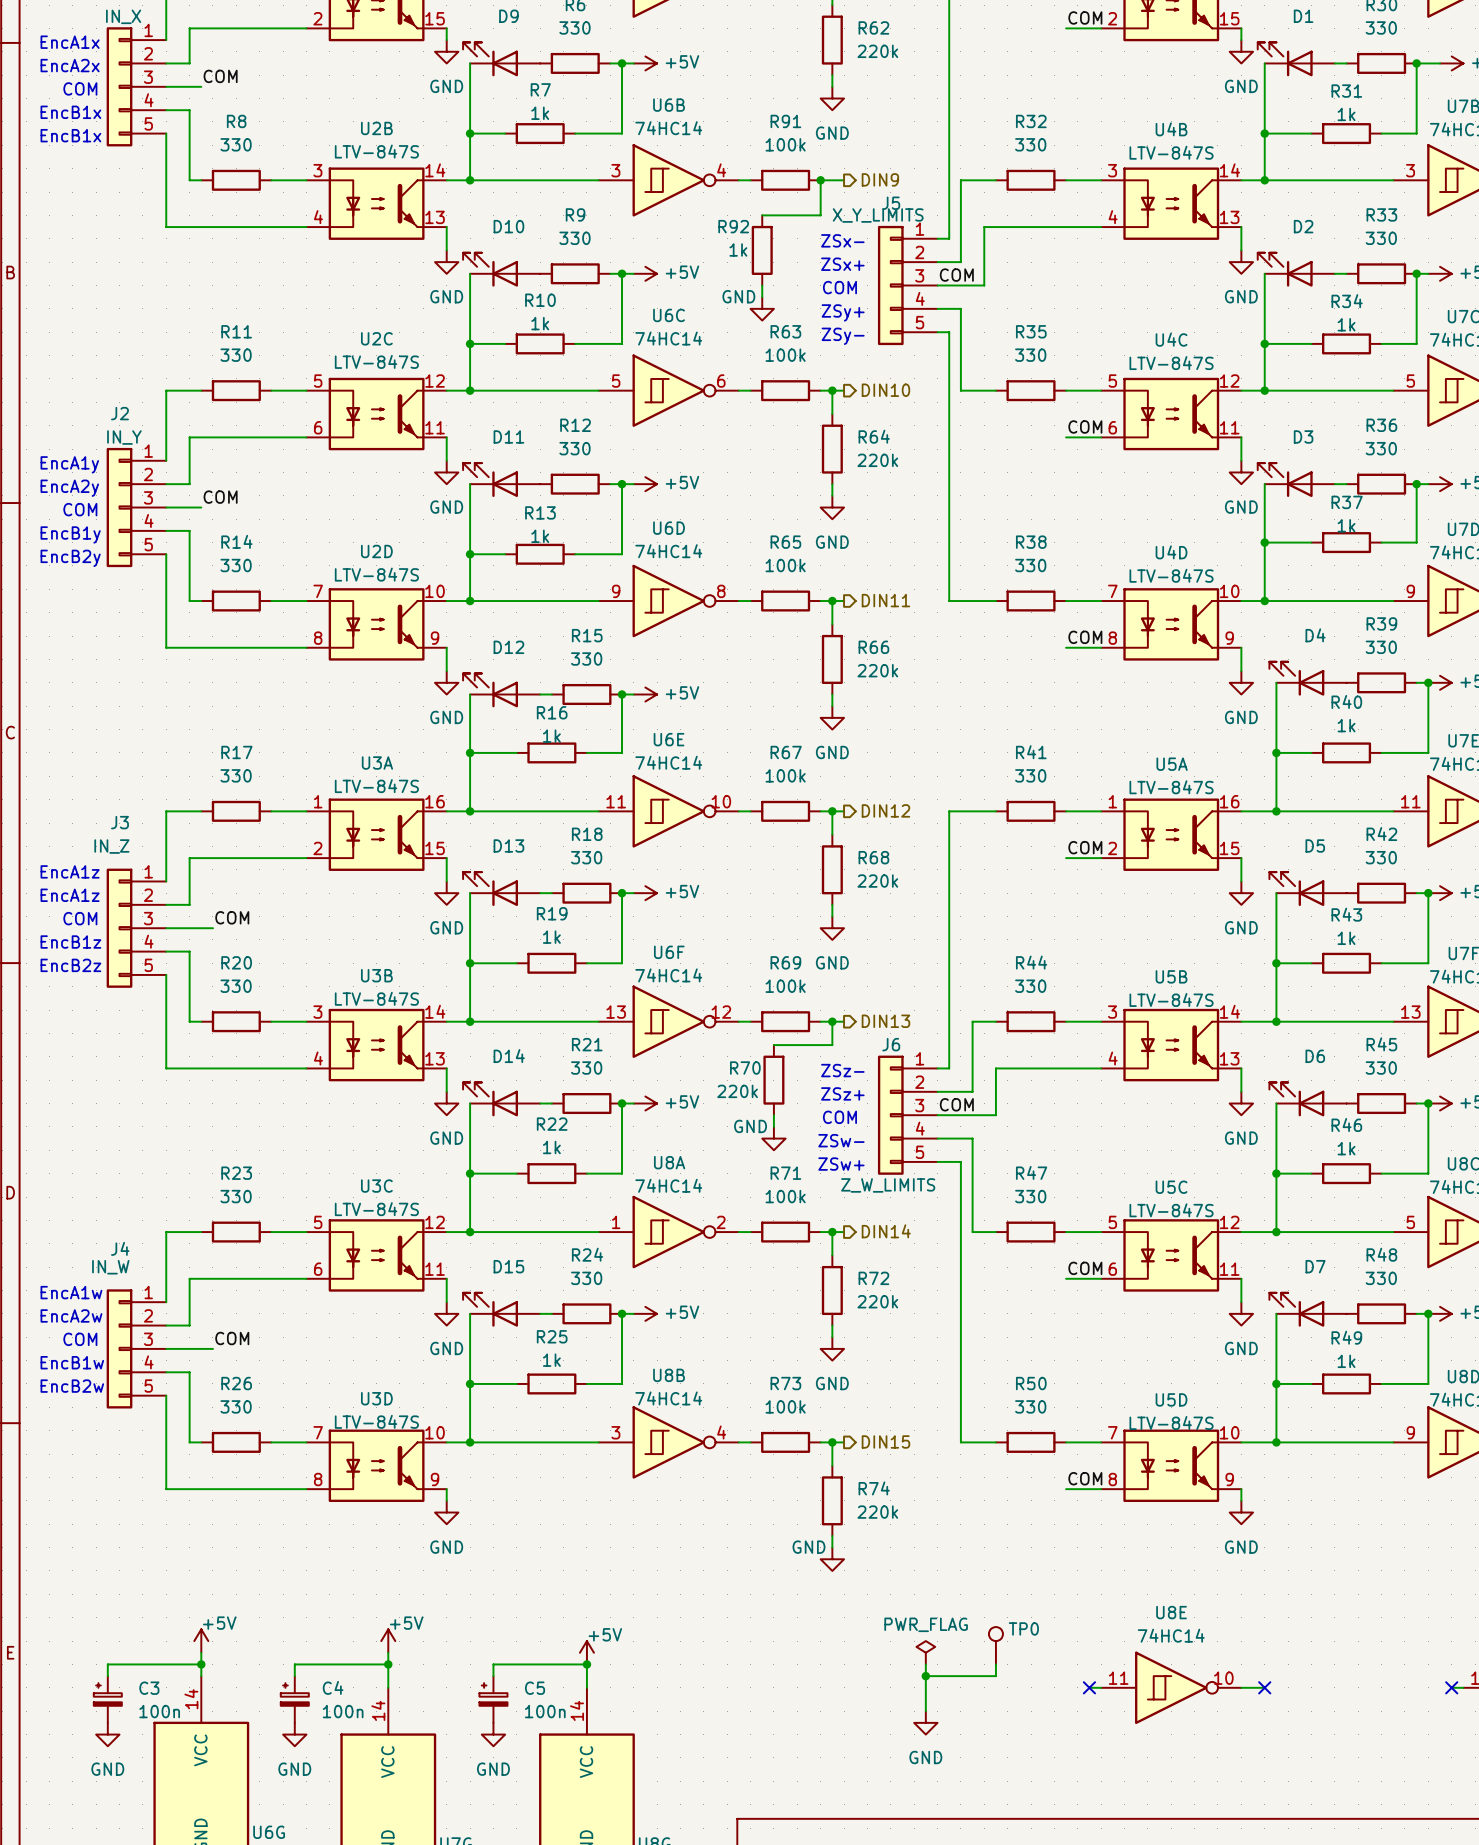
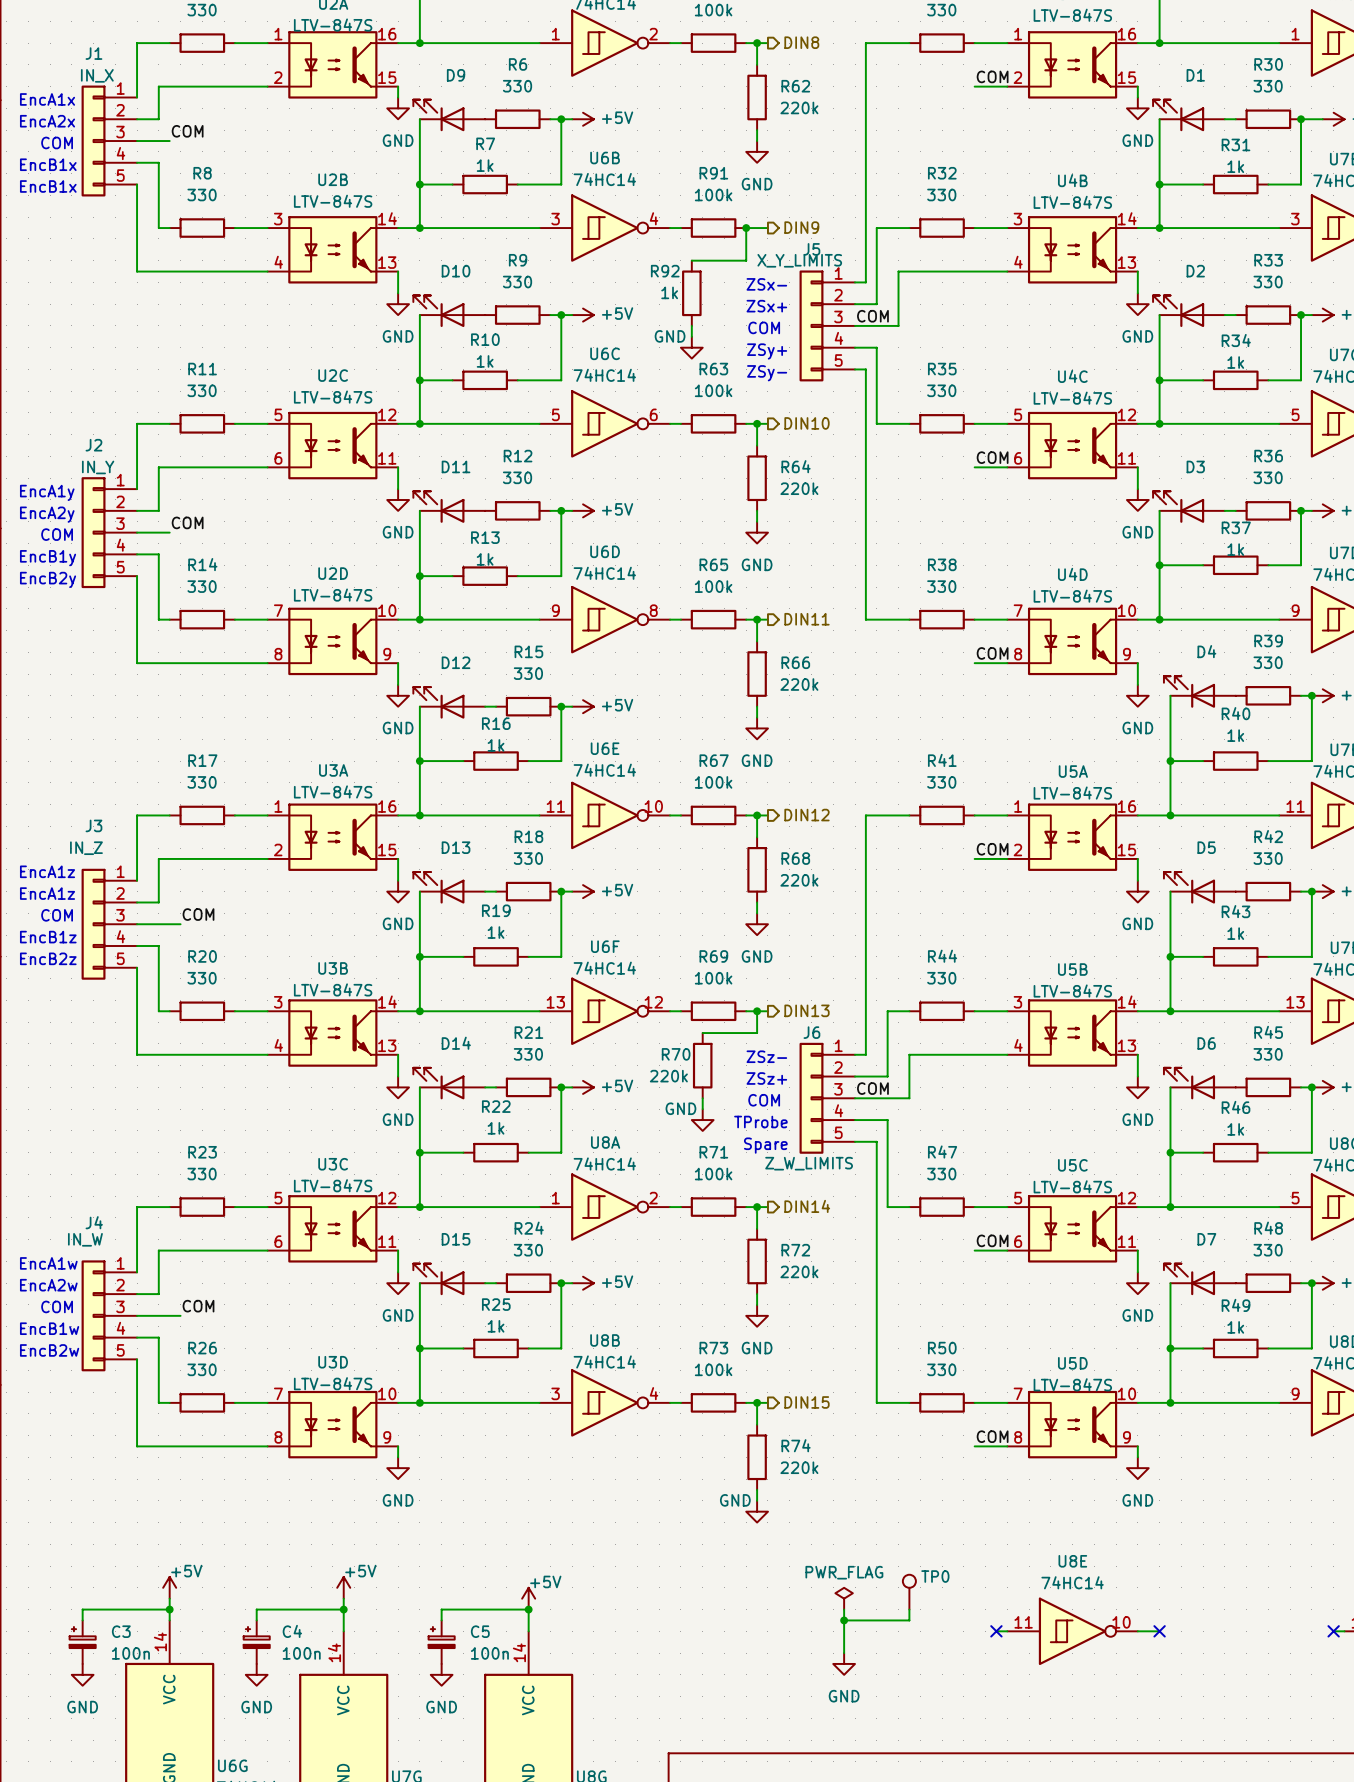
text: ZSw- (841, 1140) -> TProbe (760, 1122)
text: ZSw+ (841, 1164) -> Spare (765, 1145)

